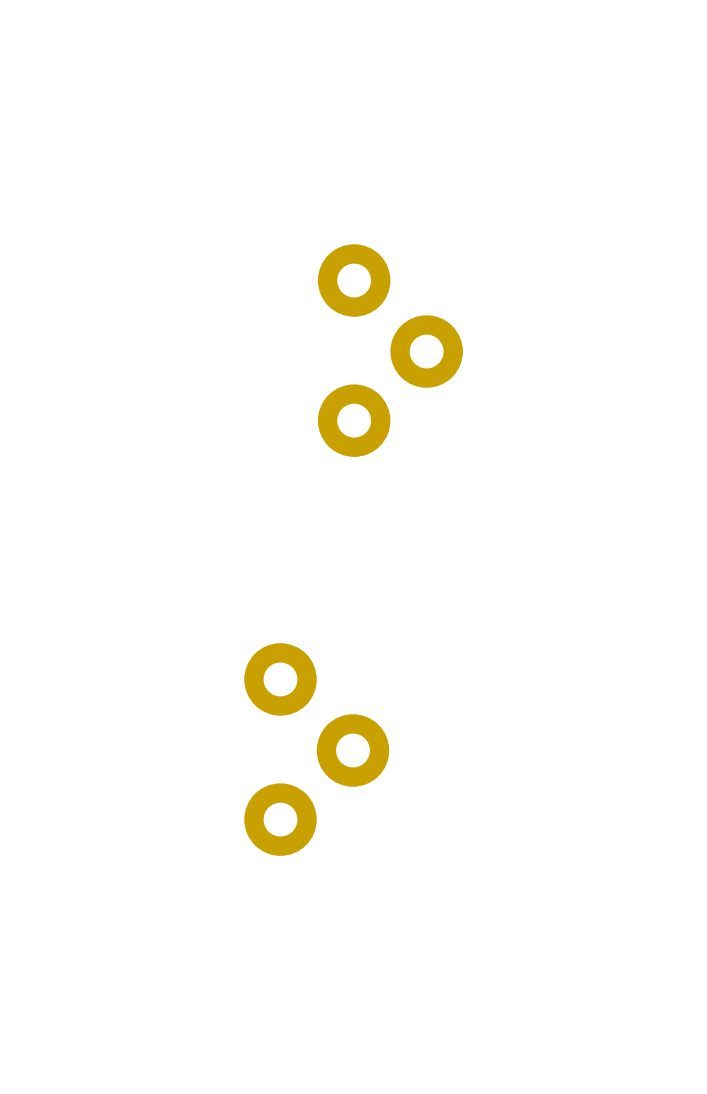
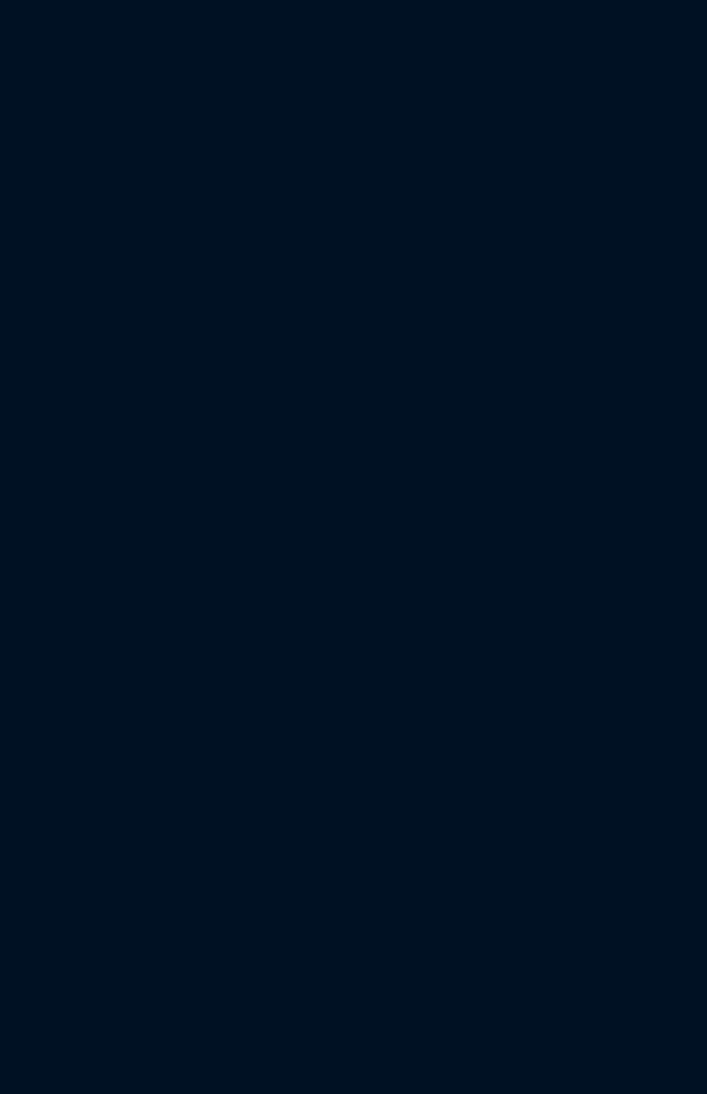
part: (390, 350) -> none
part: (316, 749) -> none

